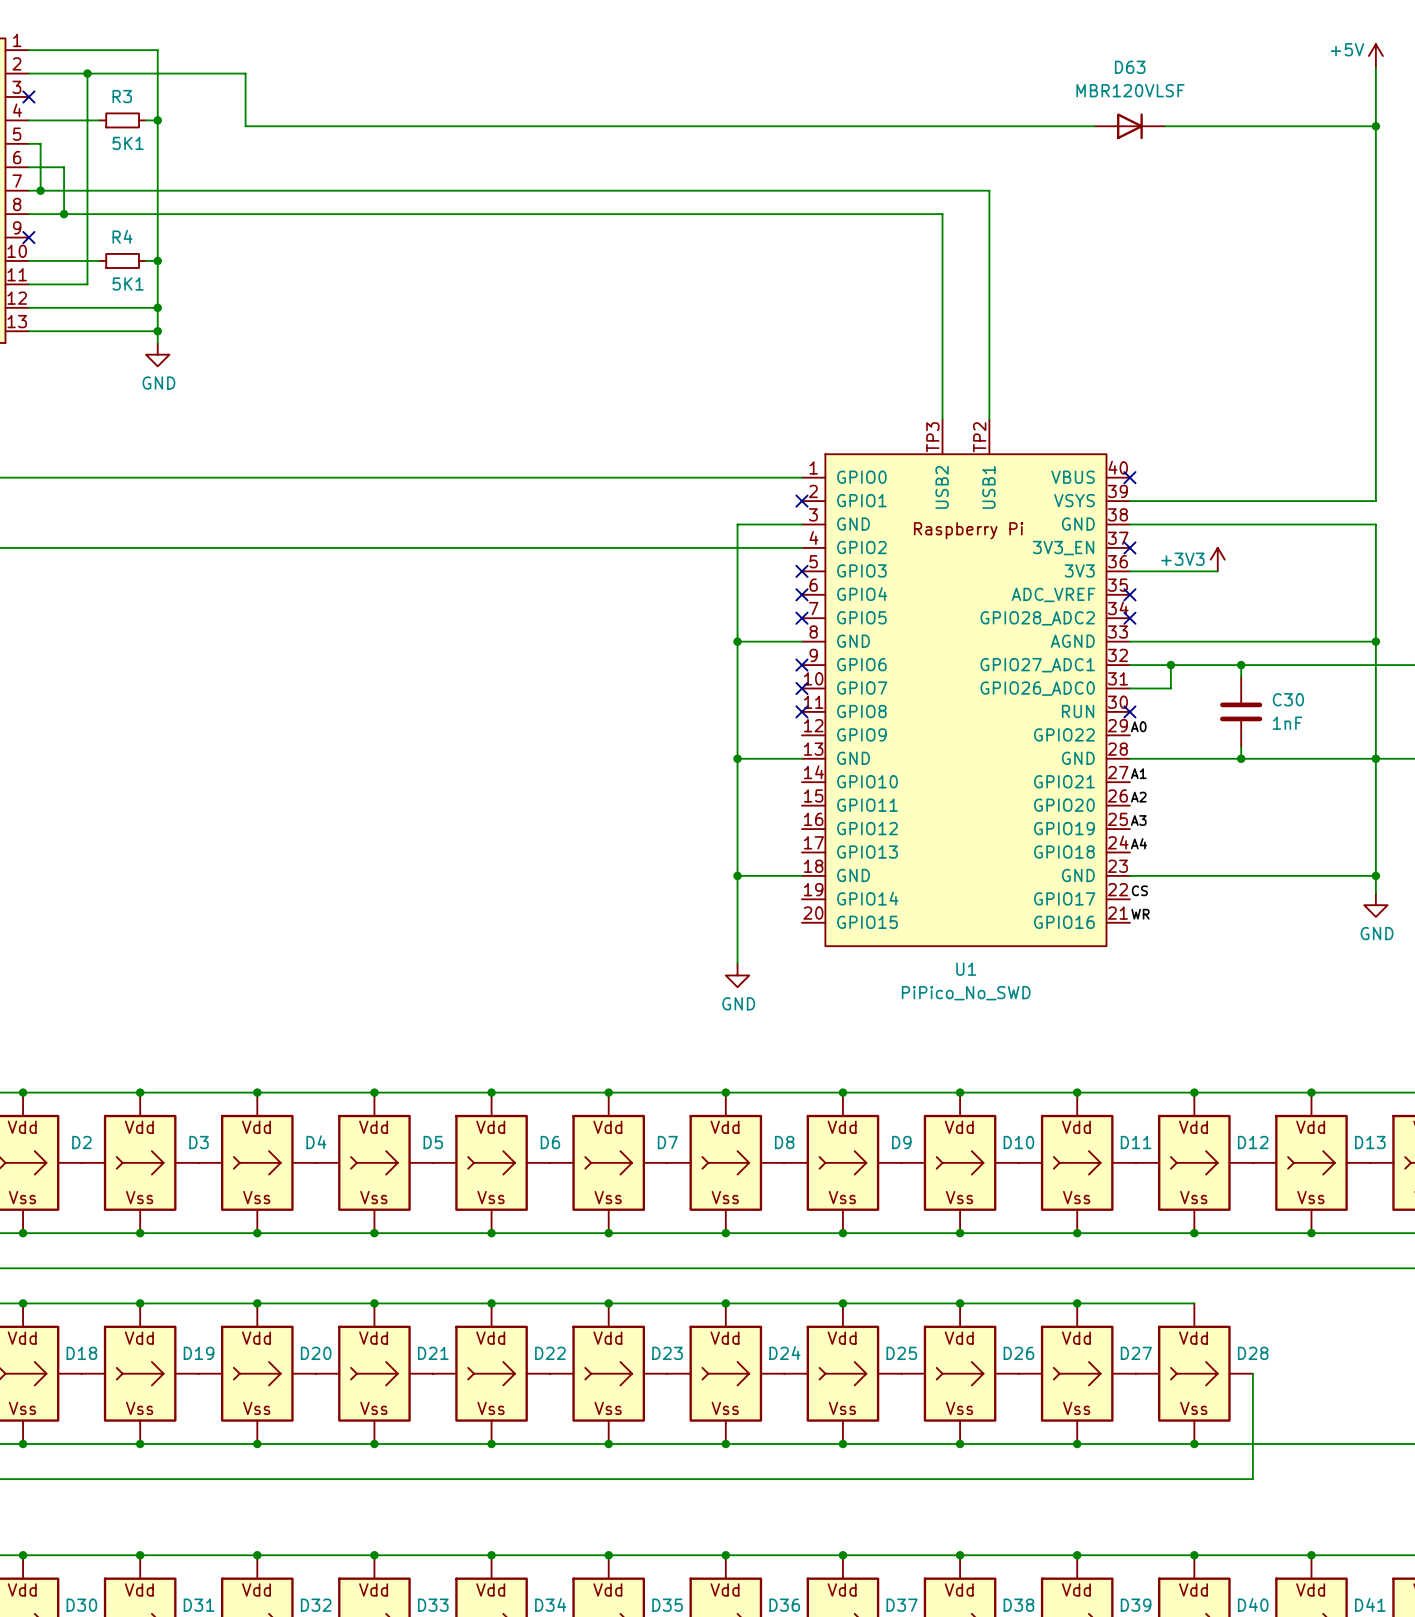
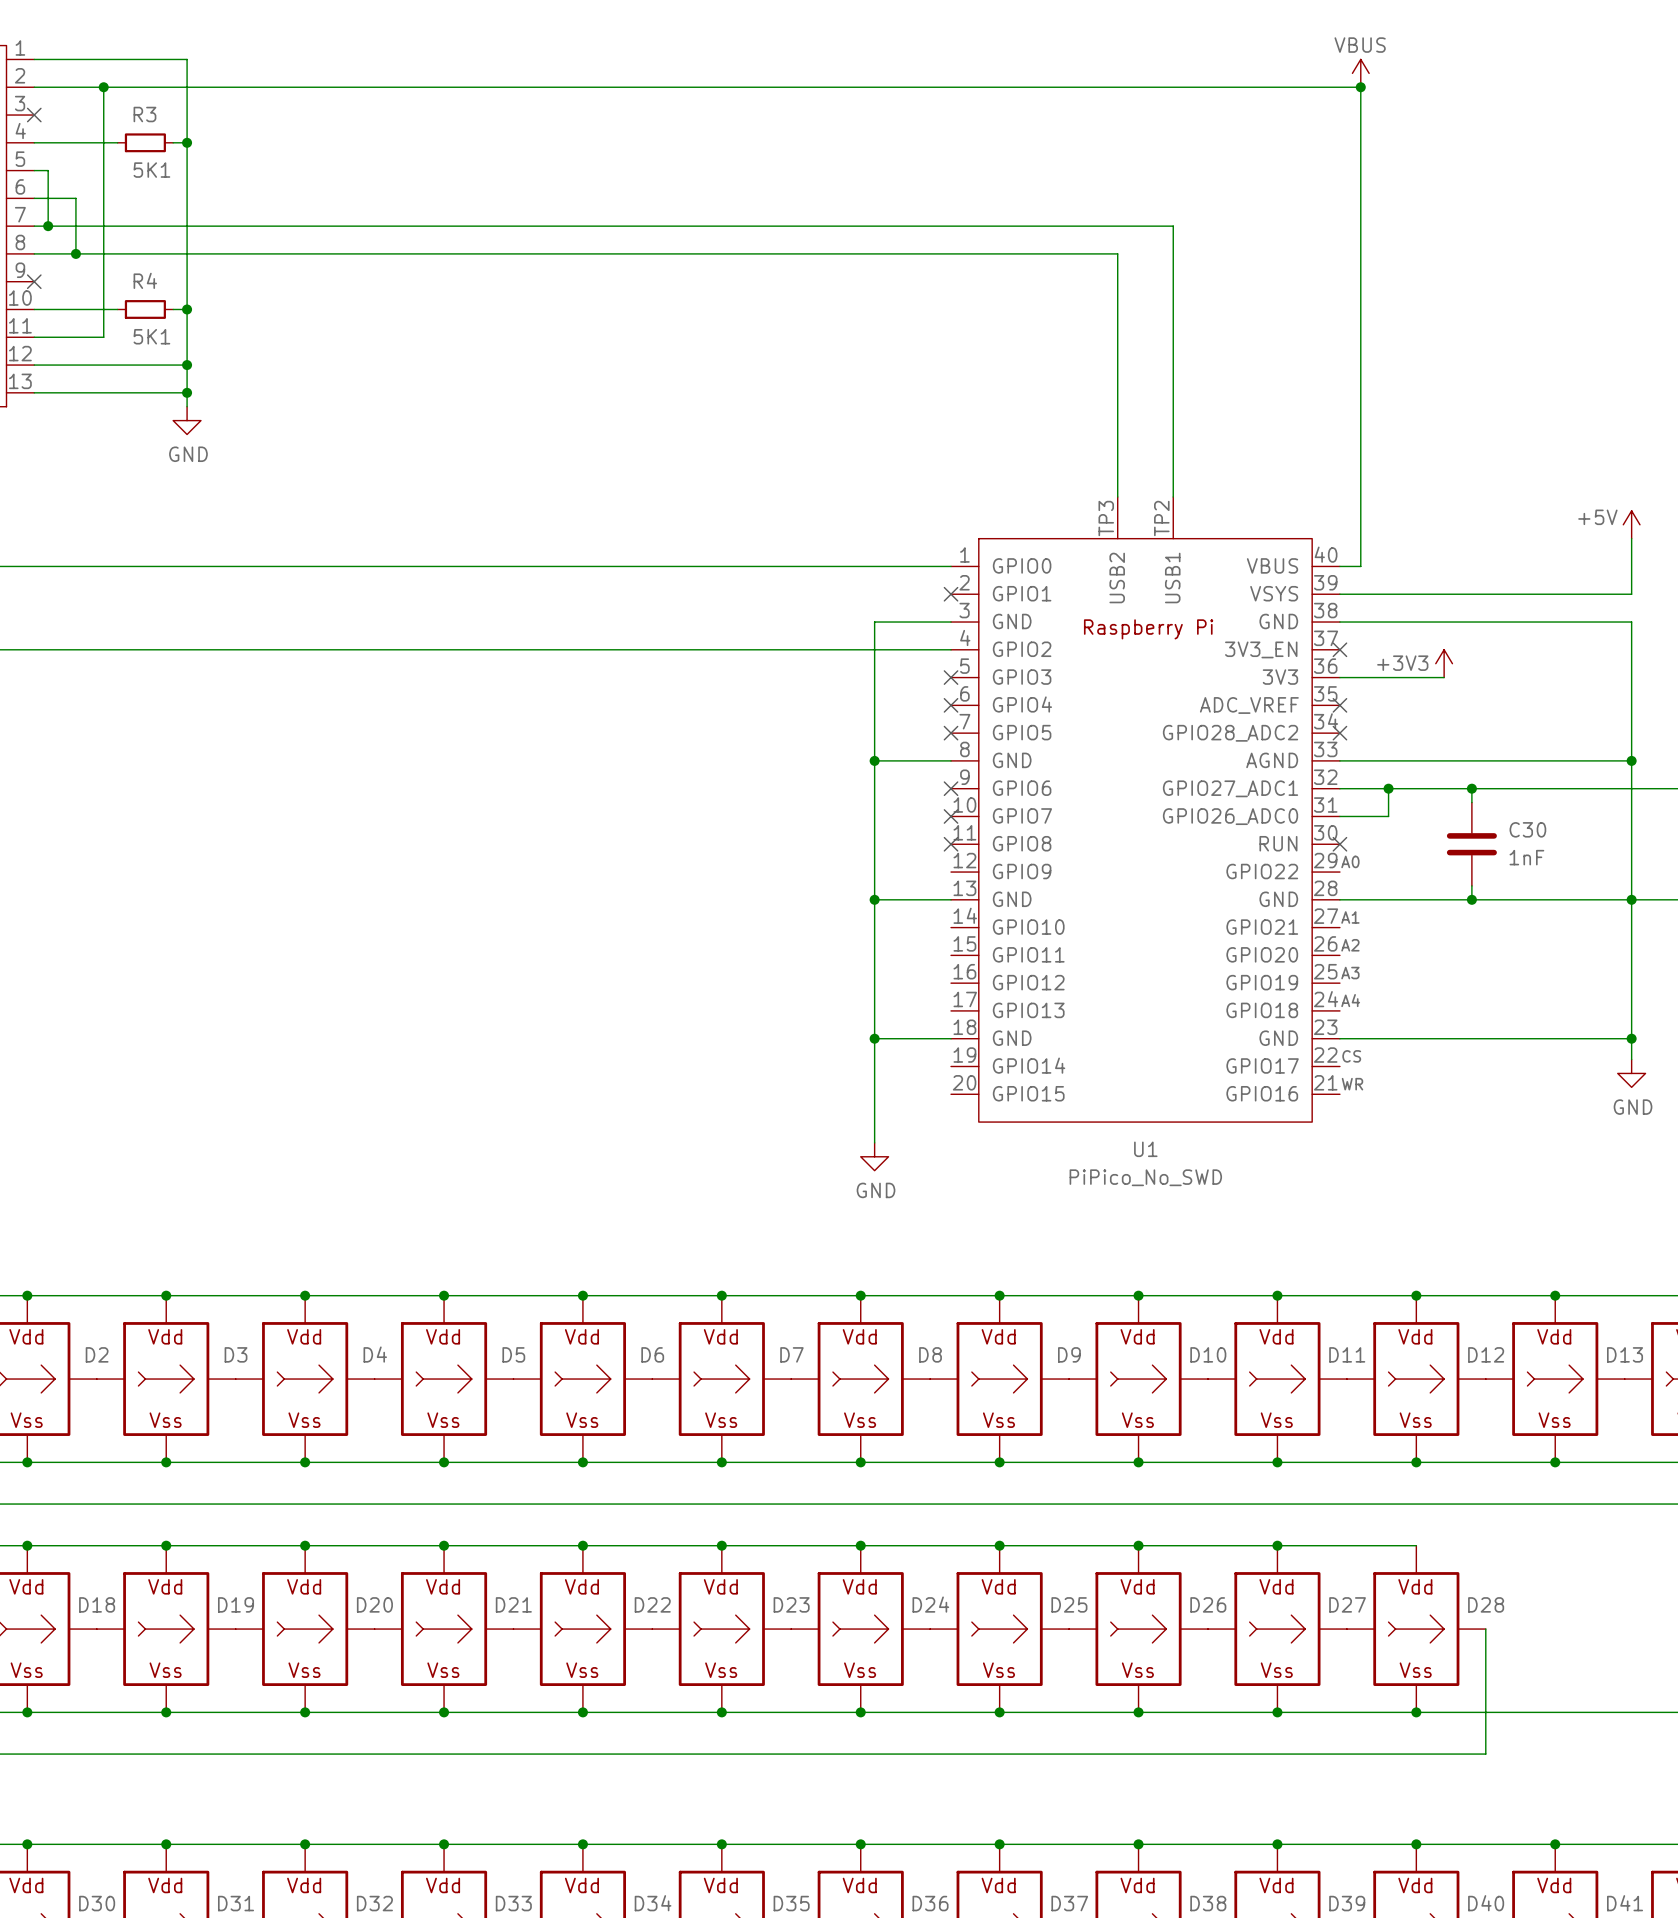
power symbol: +5V (1375, 56) -> none
power symbol: none -> VBUS (1360, 73)
wire: (1375, 67) (1375, 454) -> none
wire: (245, 73) (245, 126) (1094, 126) -> (291, 87) (1360, 87) (1360, 566) (1339, 566)
junction: none -> (1360, 87)
D63: MBR120VLSF (1129, 126) -> none
wire: (1165, 126) (1375, 126) -> none
junction: (1375, 126) -> none
power symbol: none -> +5V (1631, 524)
no-connect mark: (1129, 477) -> none

